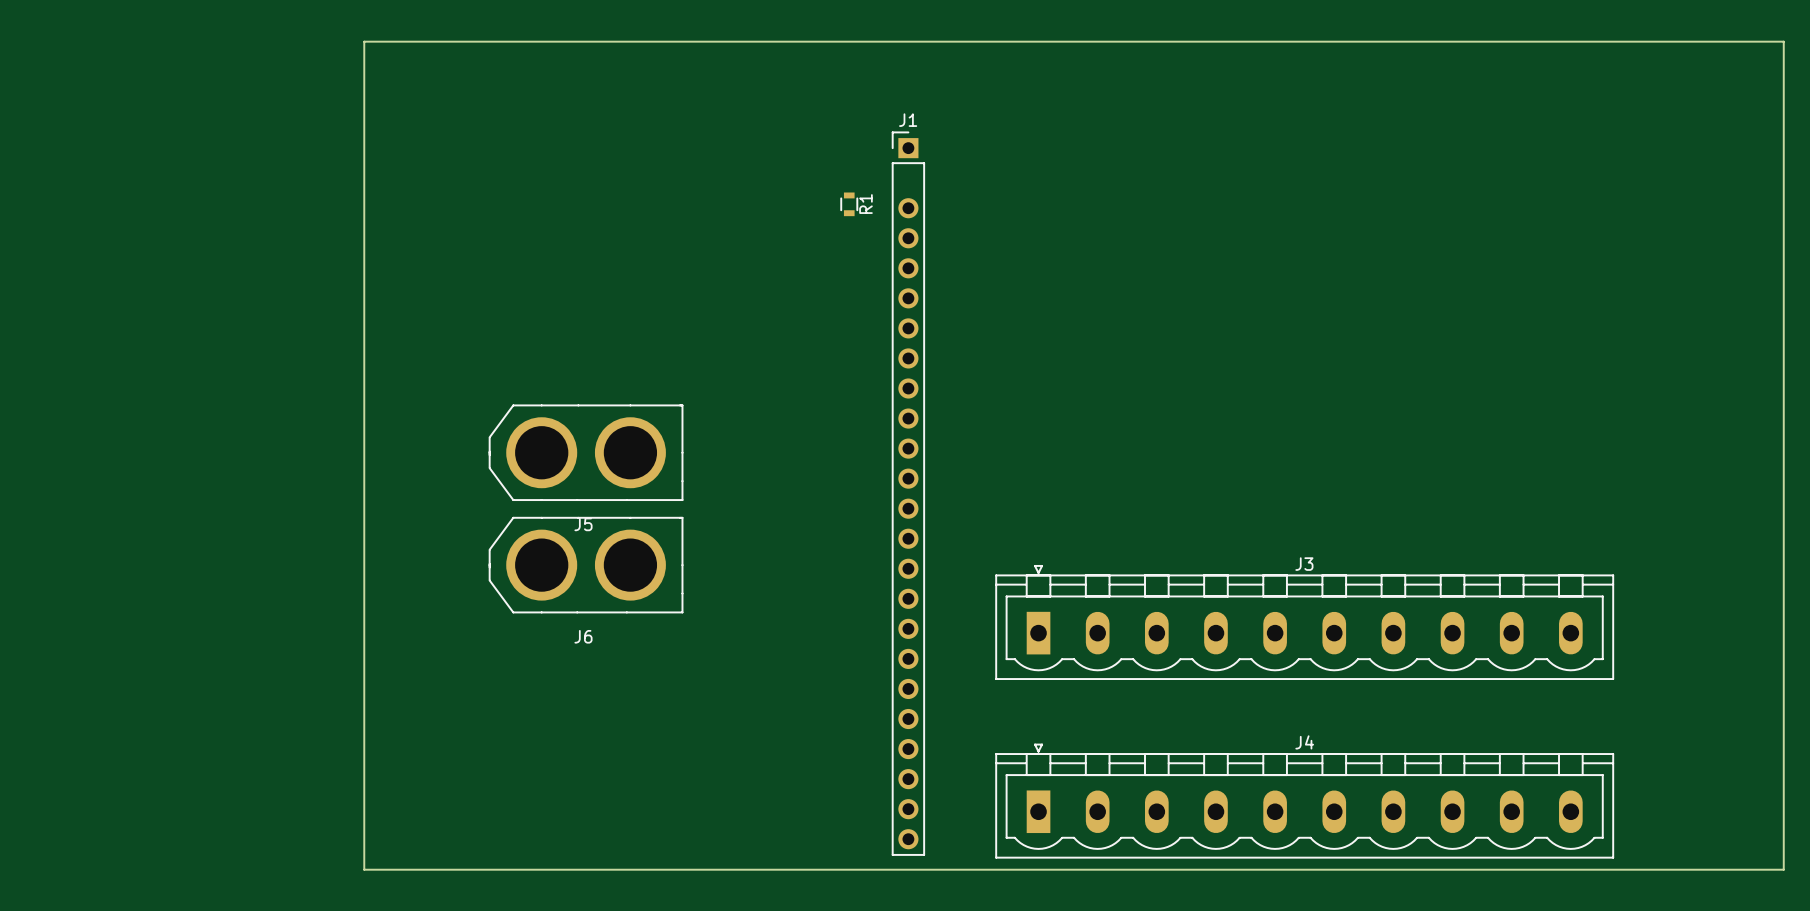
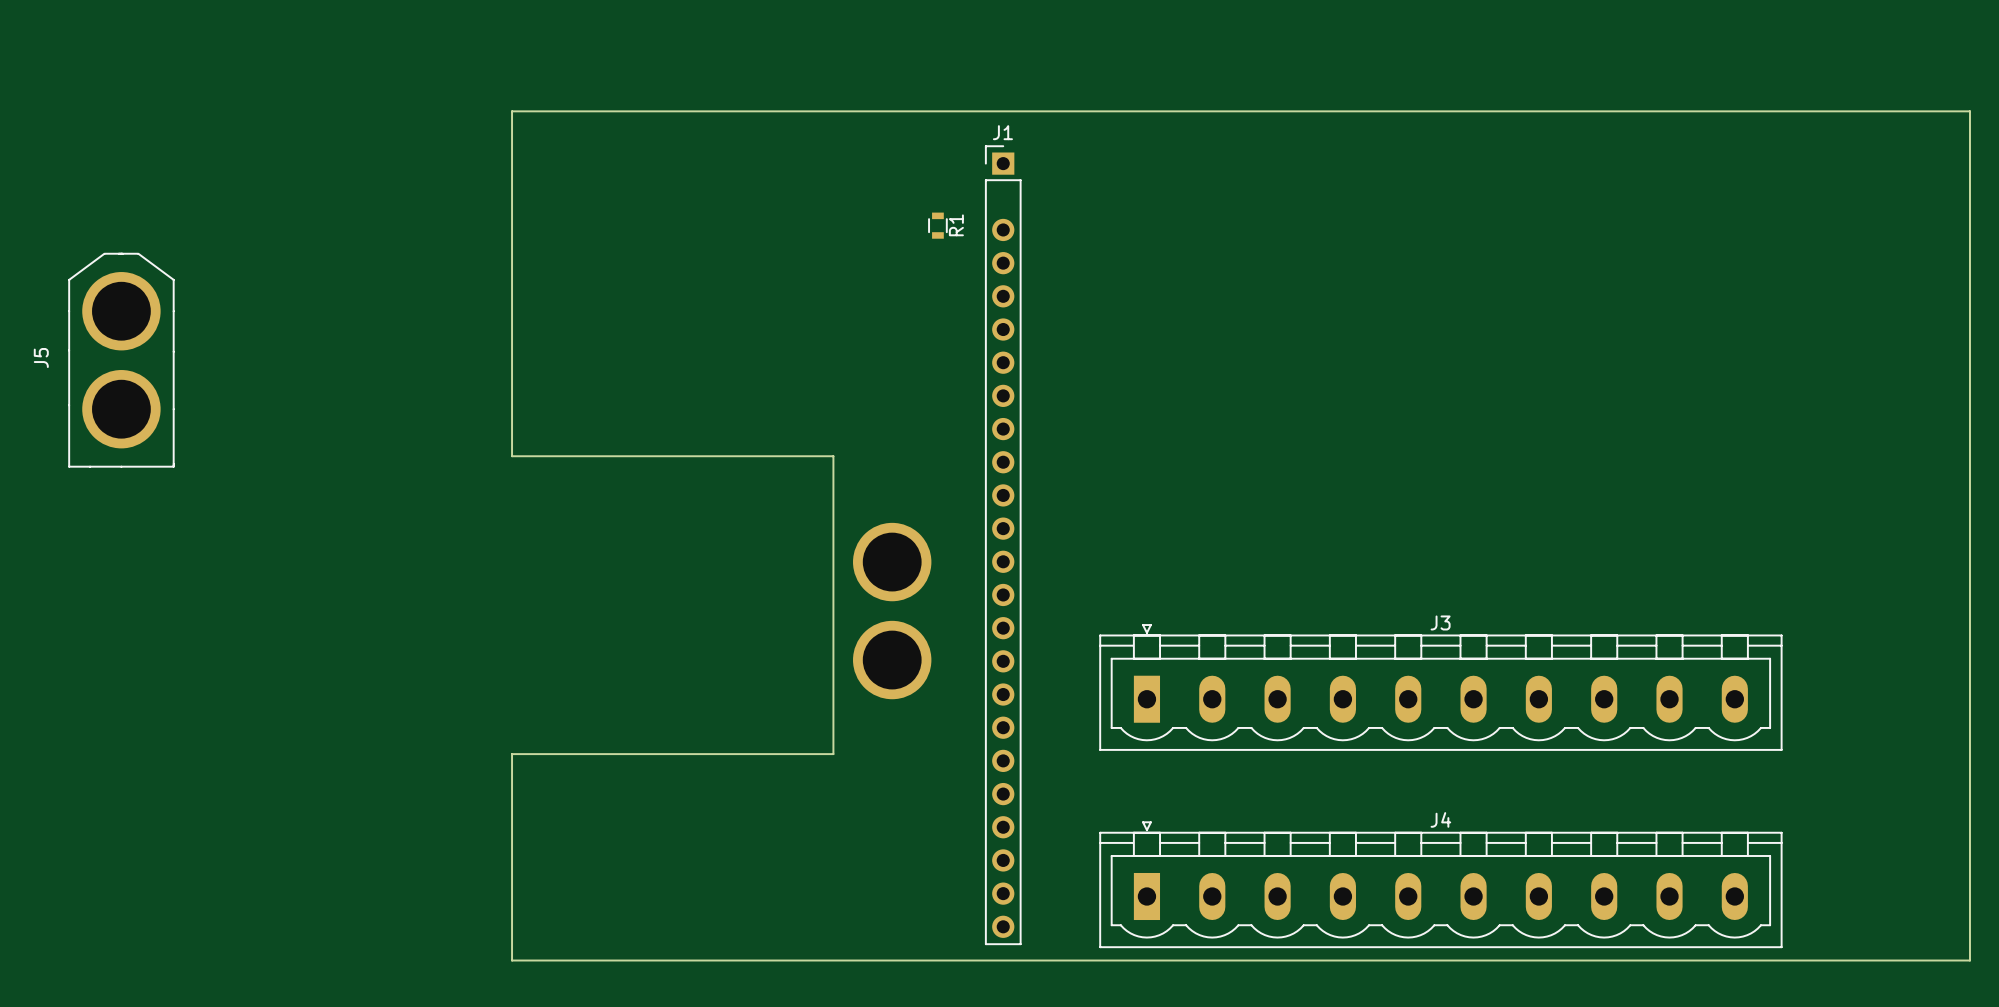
board edge: (1783, 100) (1783, 41) (364, 41) (364, 869) (463, 869) -> (1969, 111) (512, 111) (512, 456) (833, 456) (833, 754) (512, 754) (512, 960)
J5 rotation: 0° (586, 452) -> 90° clockwise (121, 360)
J5 position: (586, 452) -> (121, 360)
J6 side: top (586, 565) -> bottom (892, 611)

